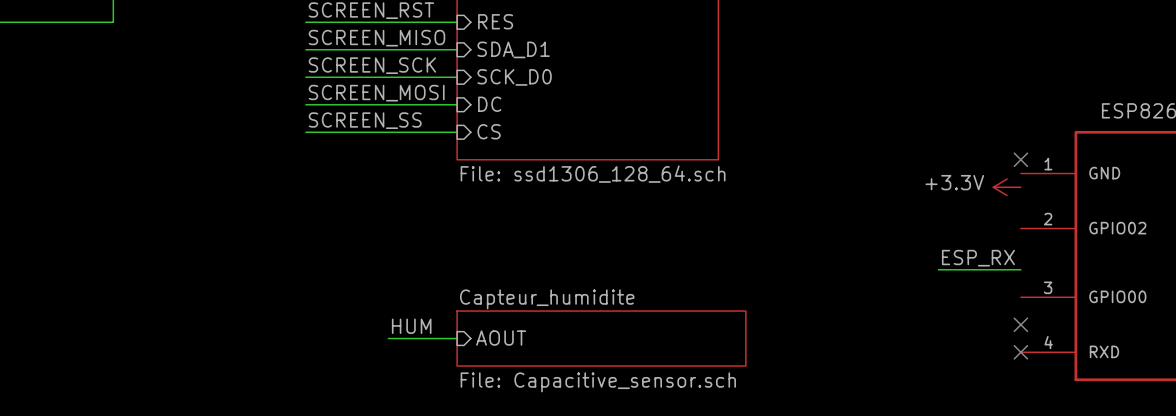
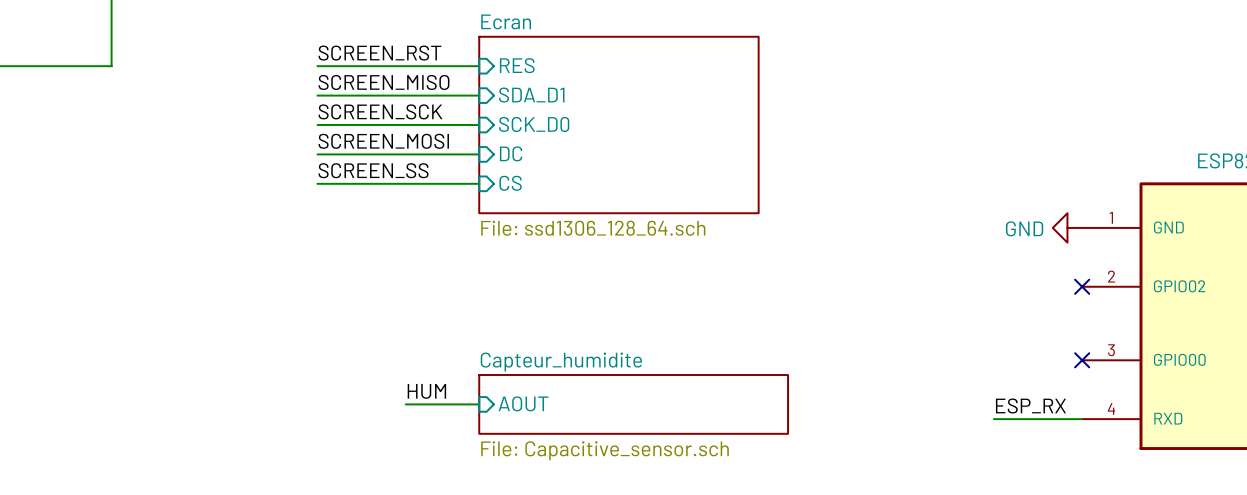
no-connect mark: (1020, 159) -> none
power symbol: none -> GND (1067, 227)
power symbol: +3.3V (1007, 187) -> none
no-connect mark: none -> (1082, 286)
label position: ESP_RX (978, 258) -> ESP_RX (1030, 405)
wire: (938, 269) (1020, 269) -> (993, 419) (1082, 419)
no-connect mark: none -> (1082, 360)
no-connect mark: (1020, 324) -> none
no-connect mark: (1020, 352) -> none

